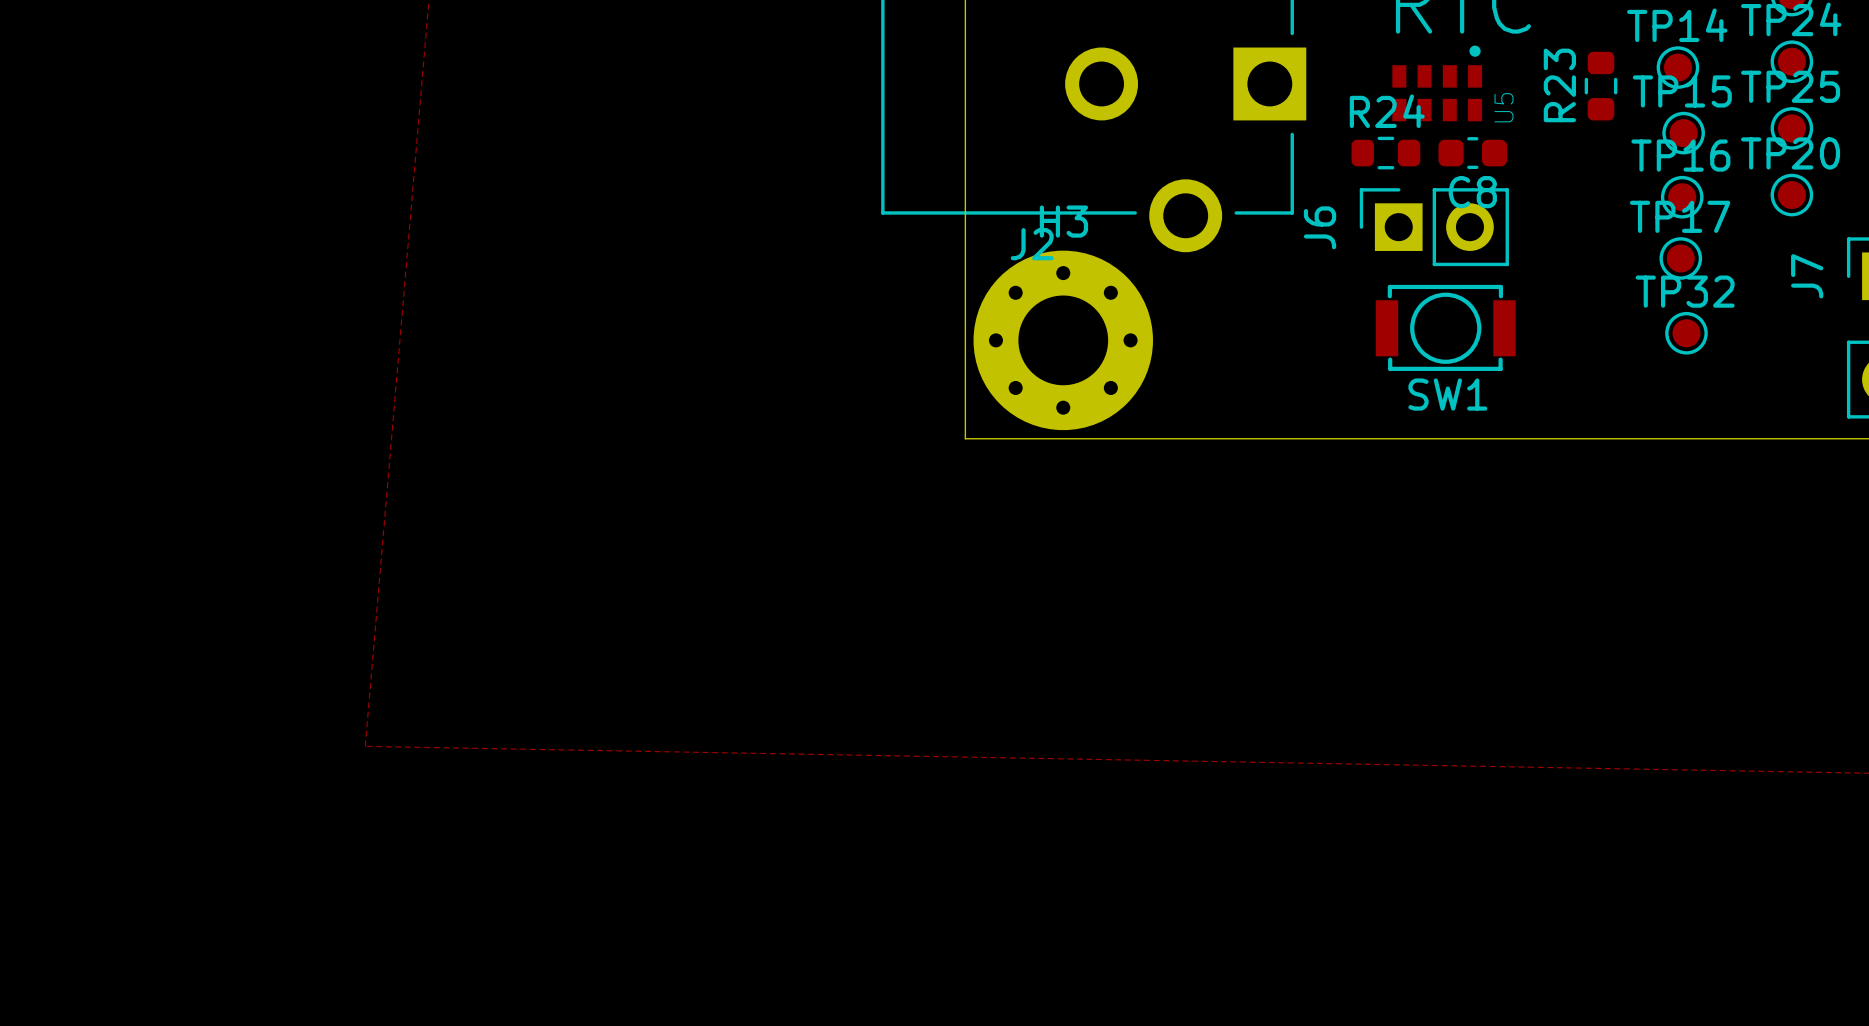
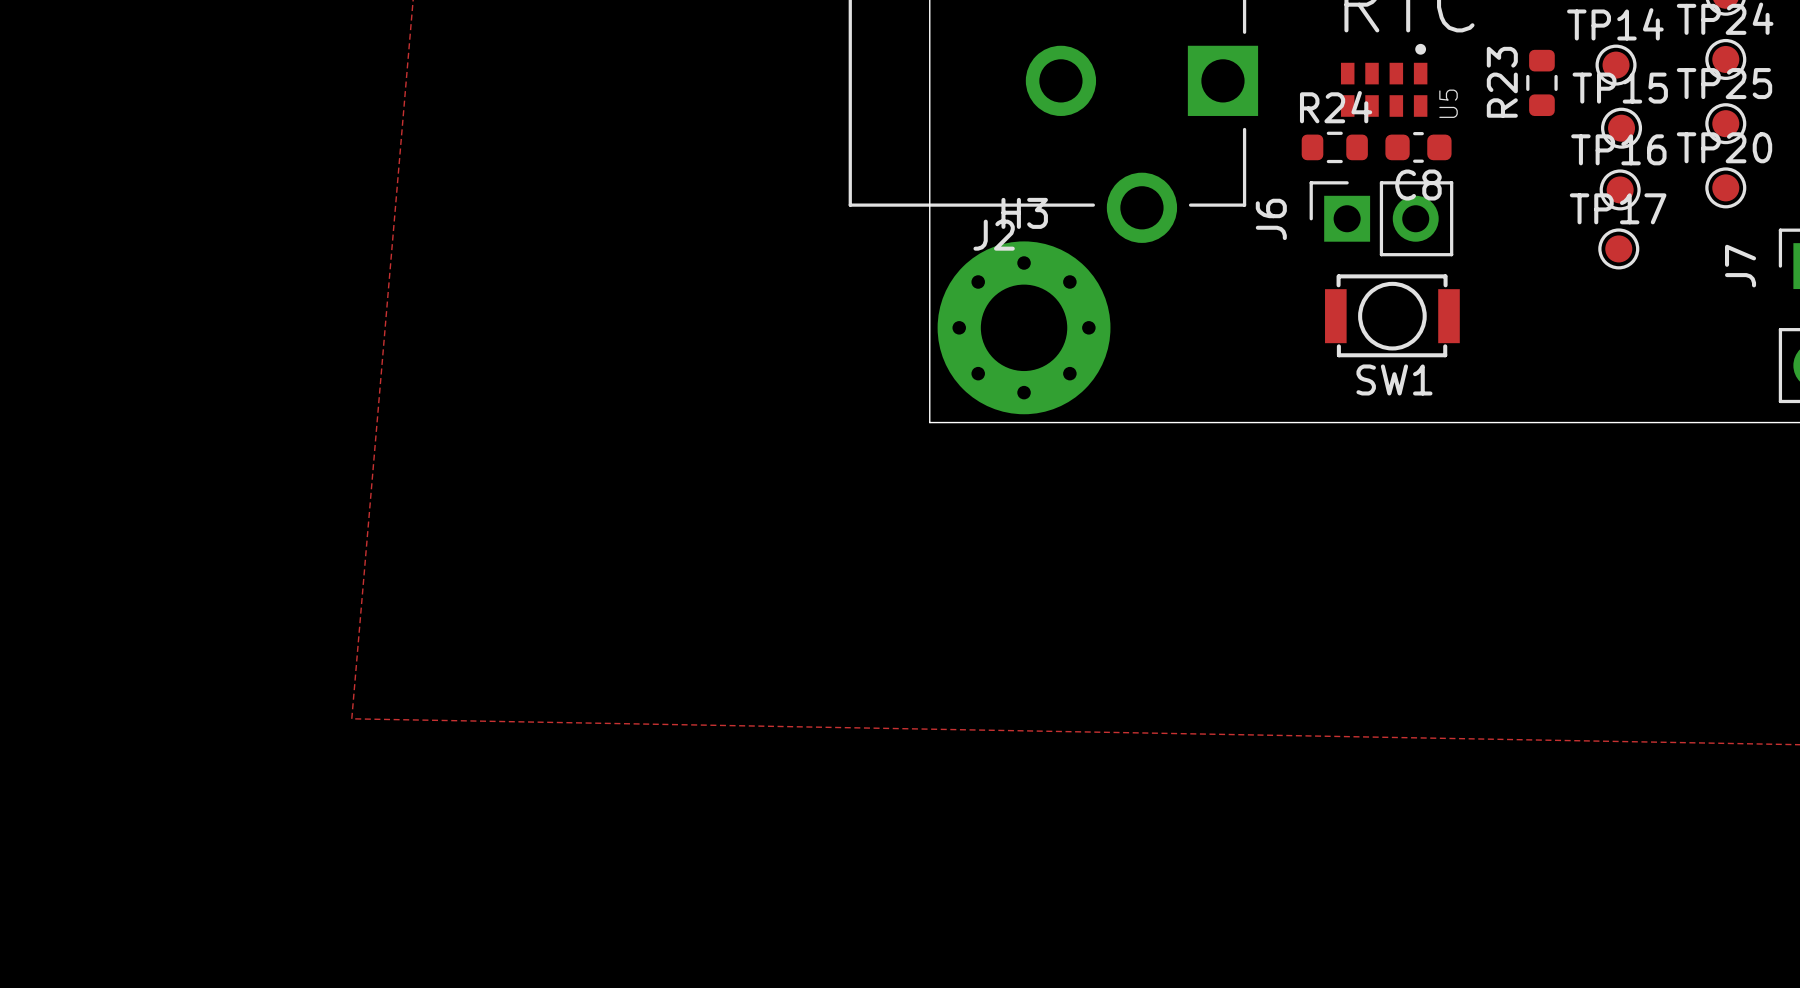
TP32: (1686, 333) -> none

